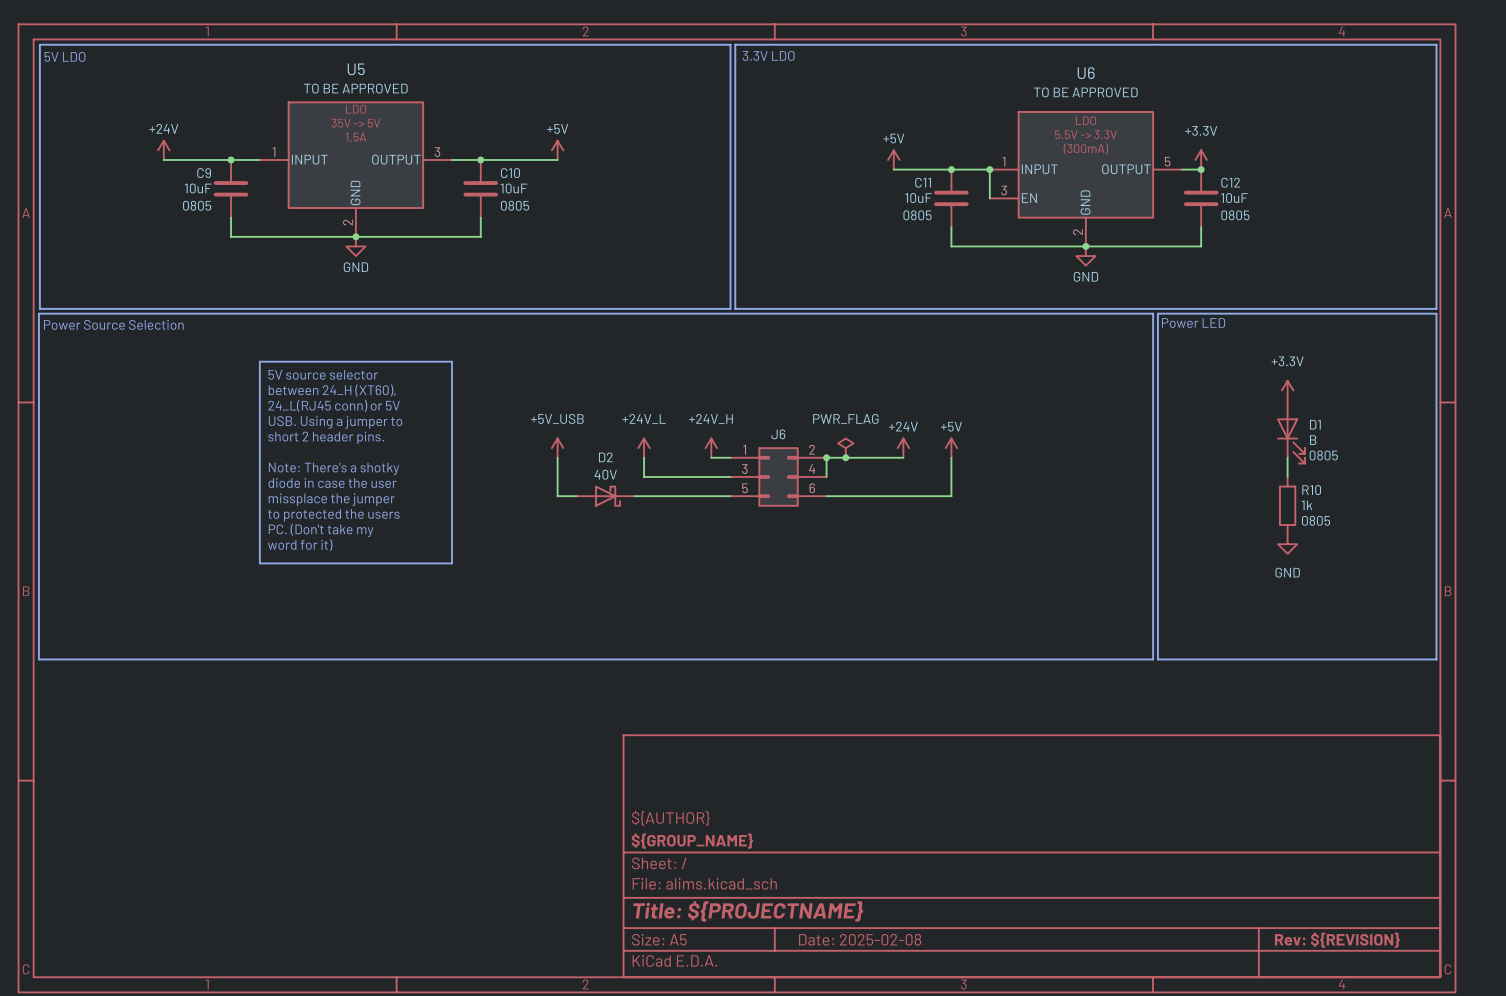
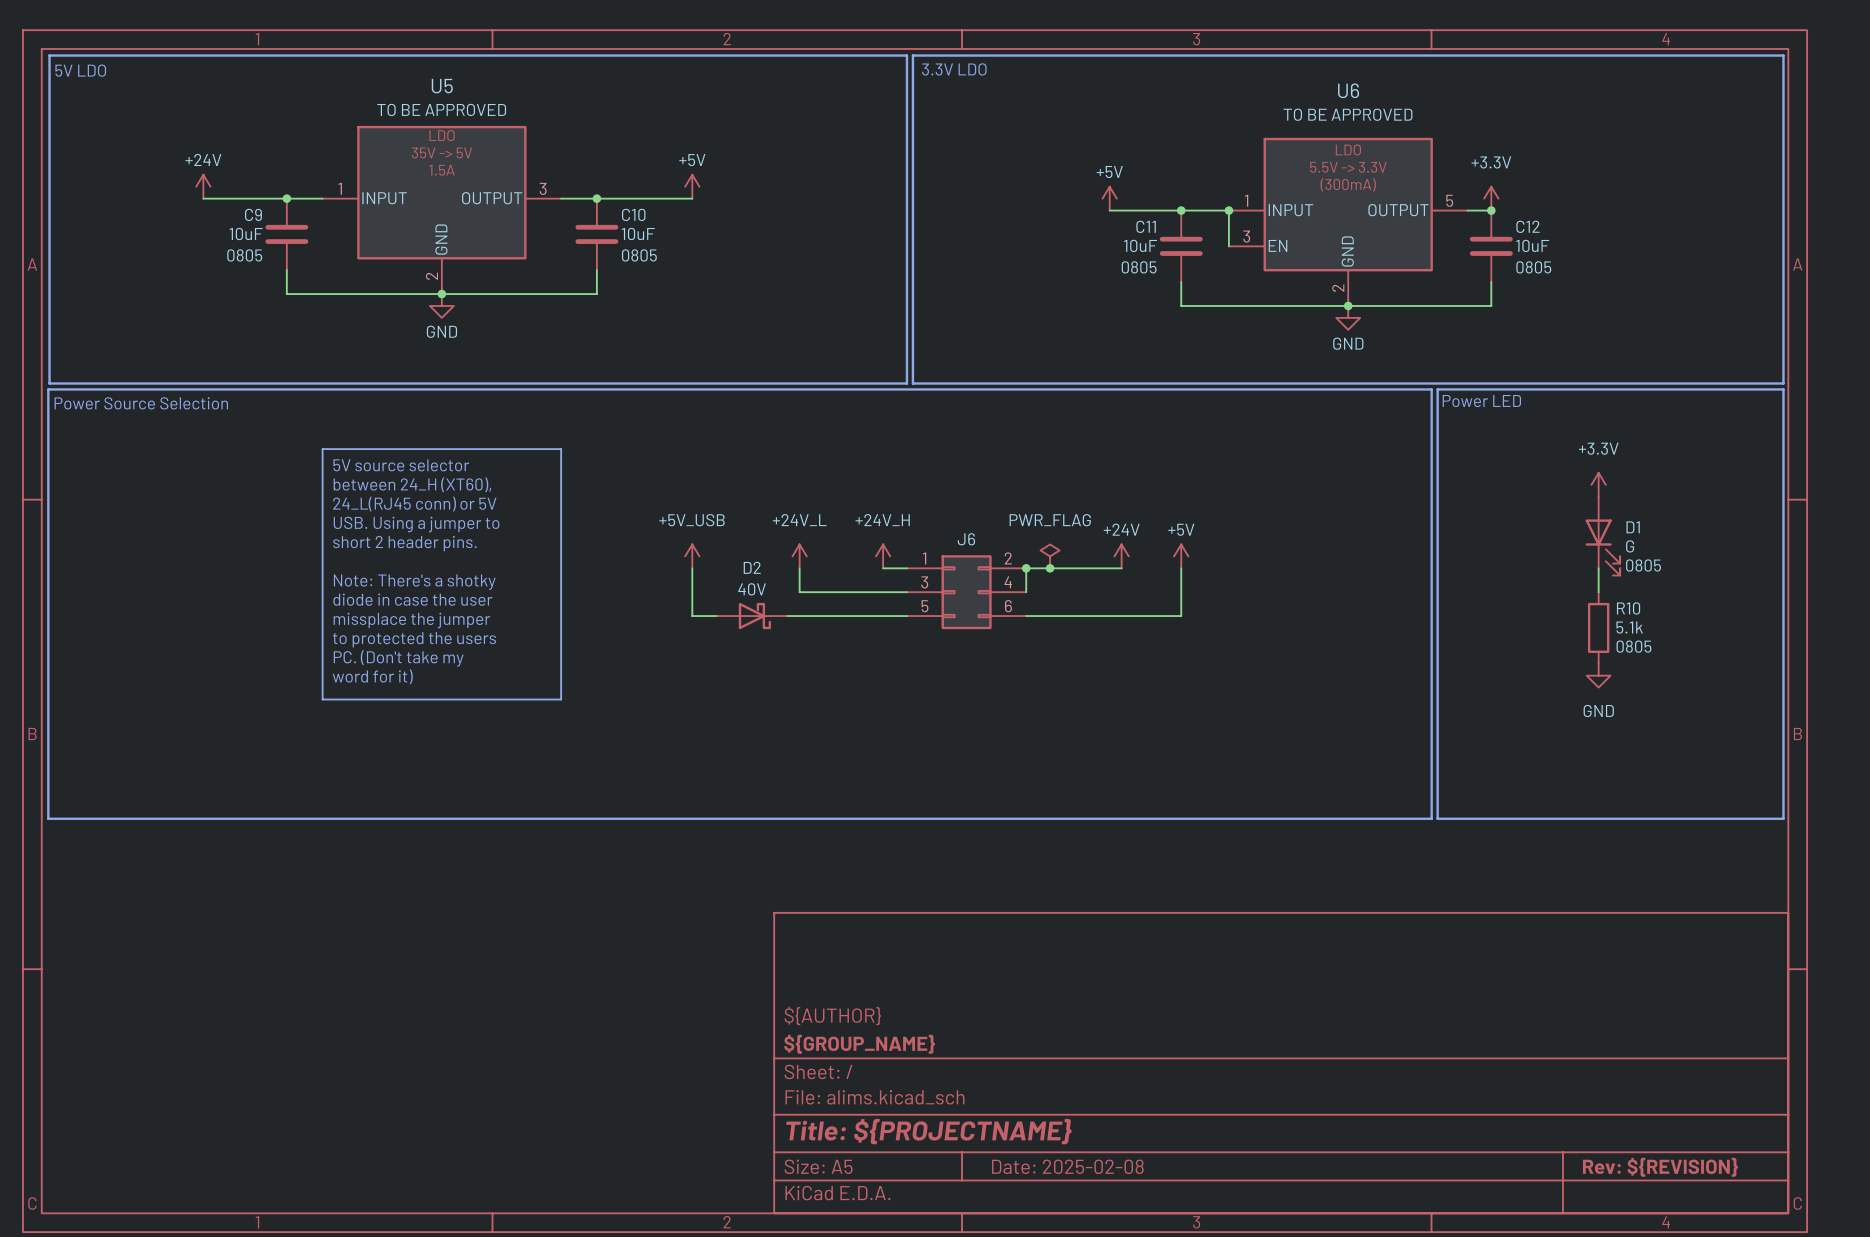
D1 value: B (1313, 440) -> G (1630, 546)
R10 value: 1k (1307, 505) -> 5.1k (1629, 627)

